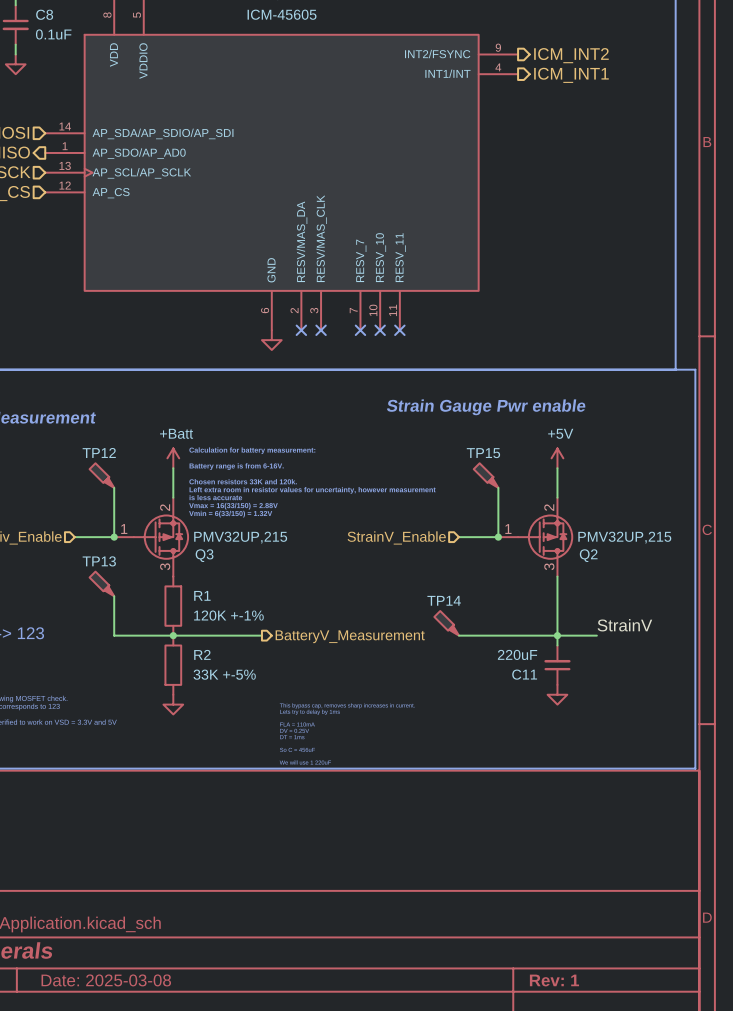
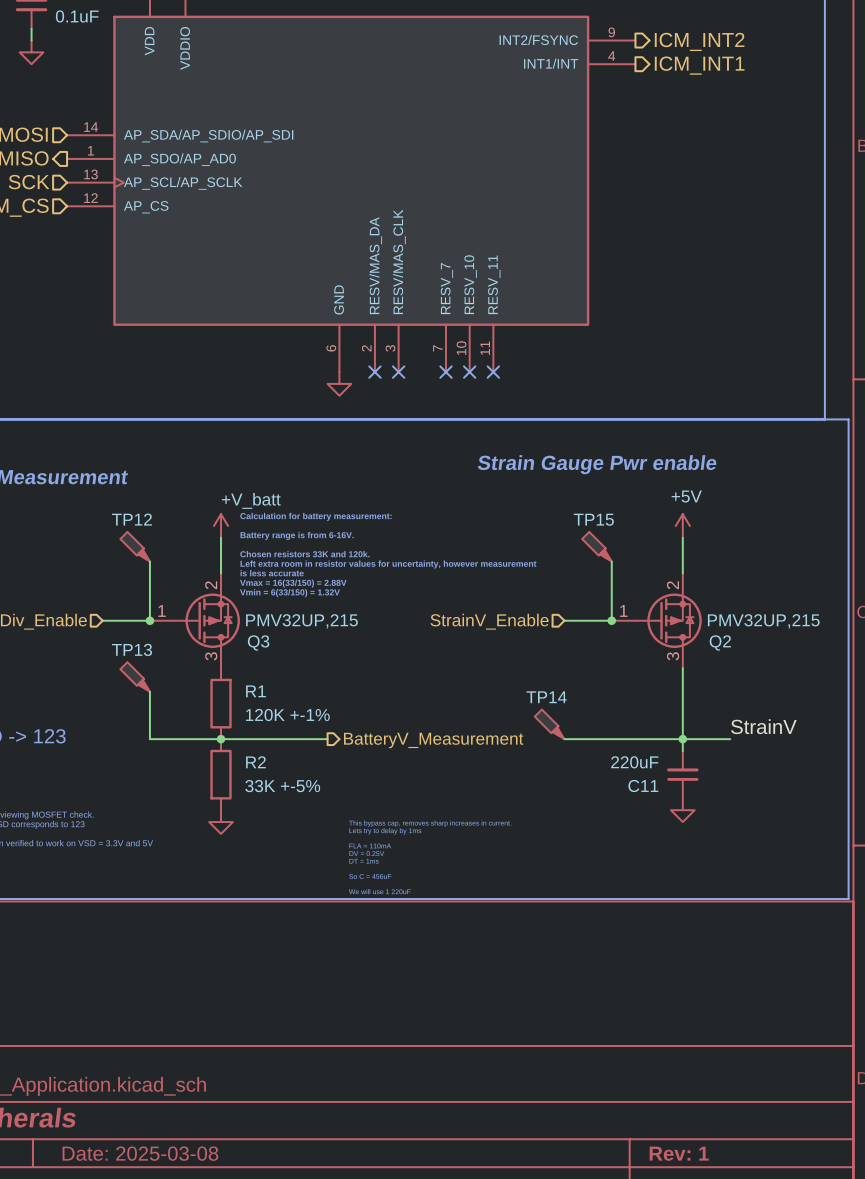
power symbol: +Batt (173, 458) -> +V_batt (221, 526)

